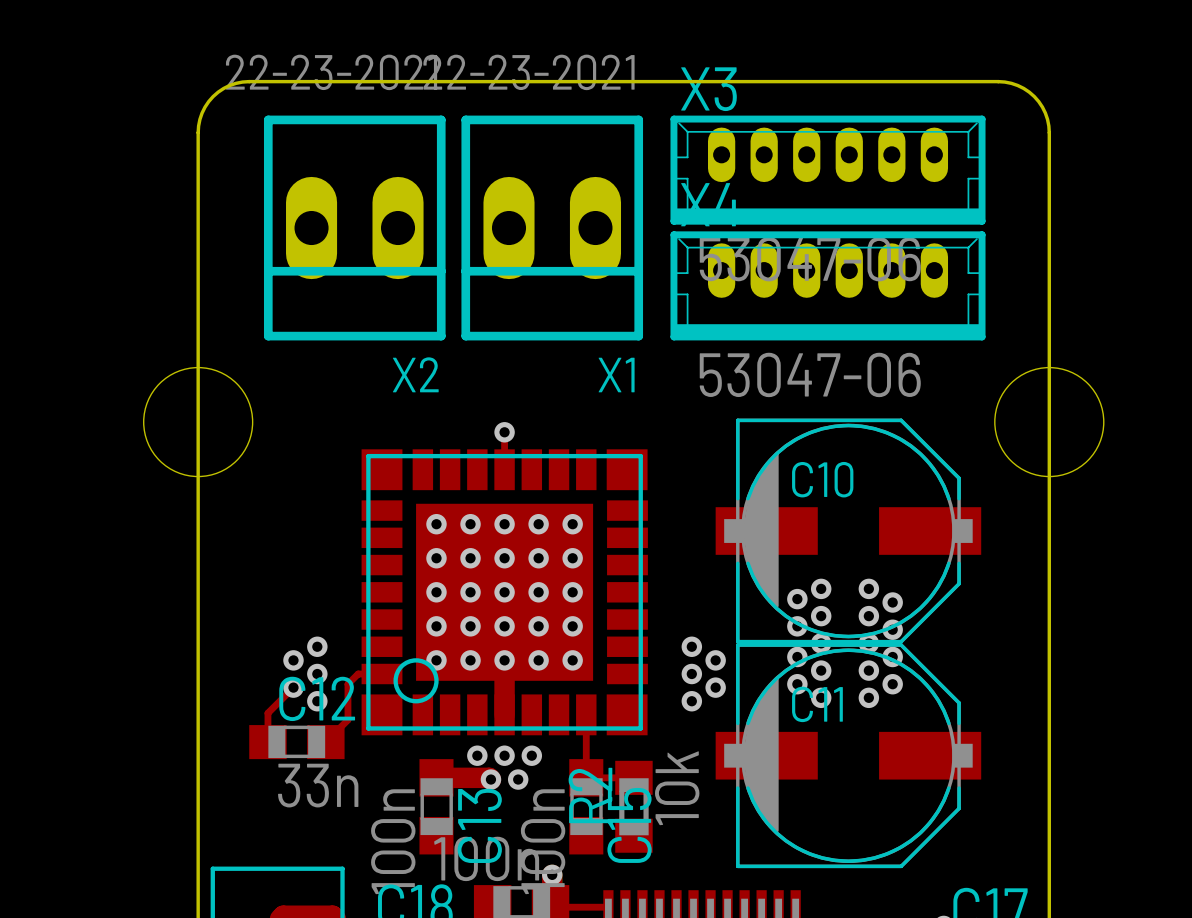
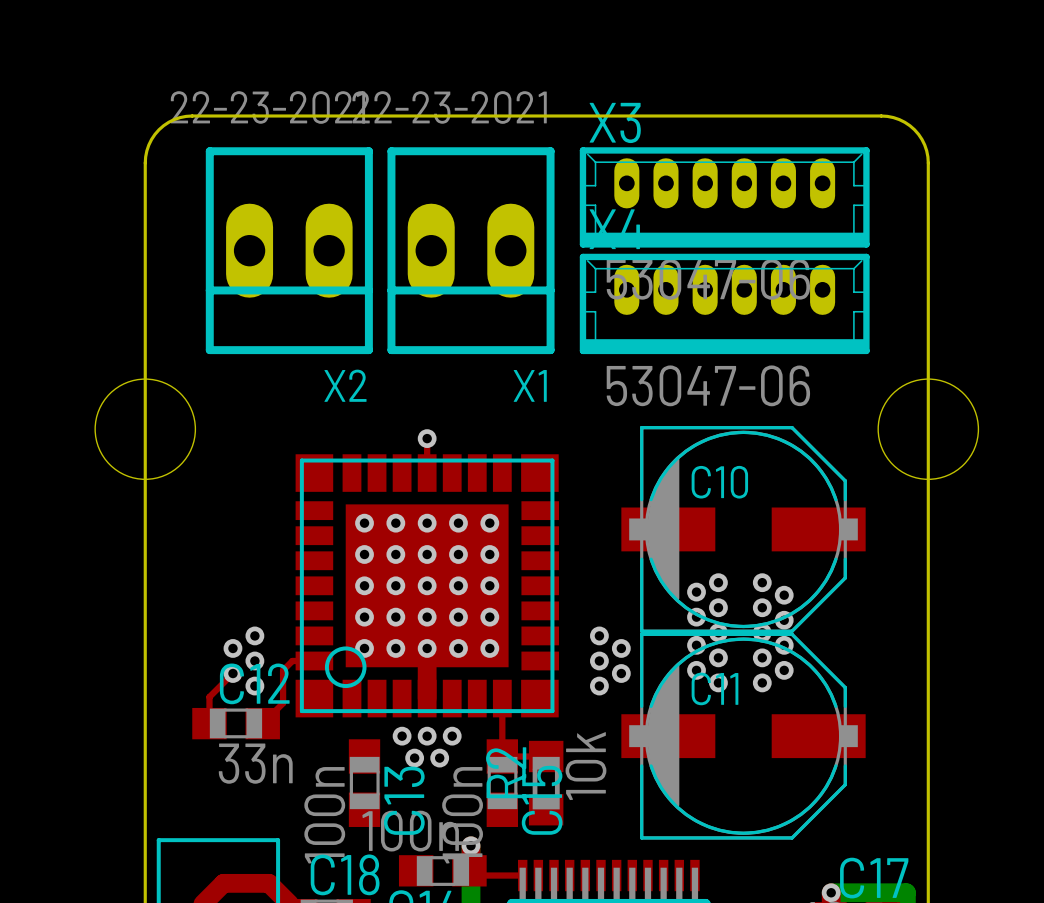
top track: (436, 777) (489, 777) (490, 779) -> none

